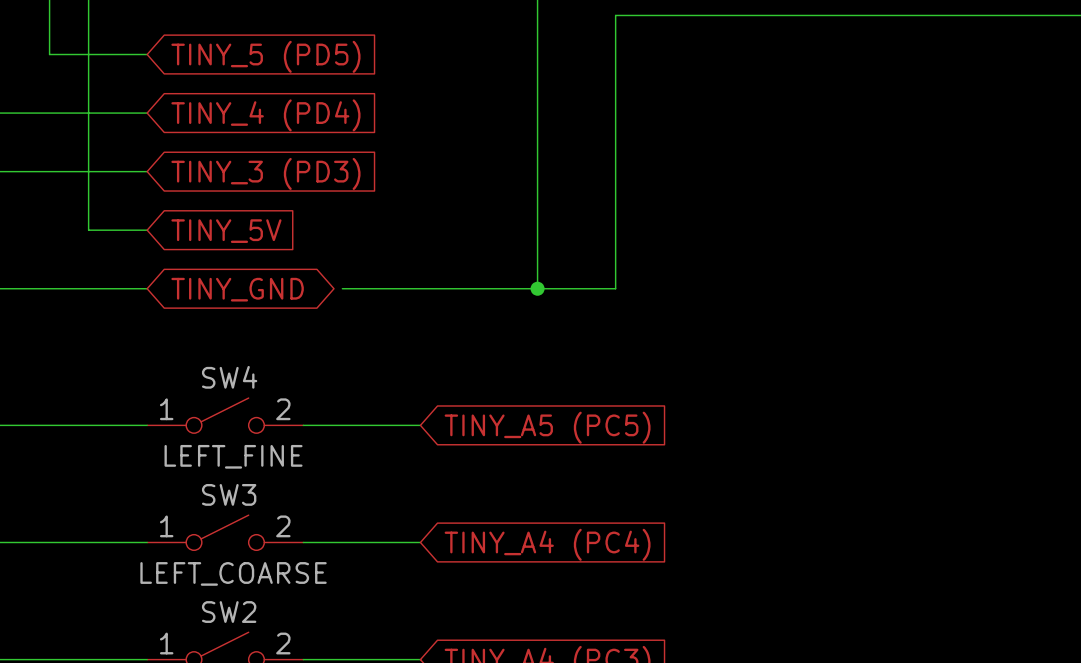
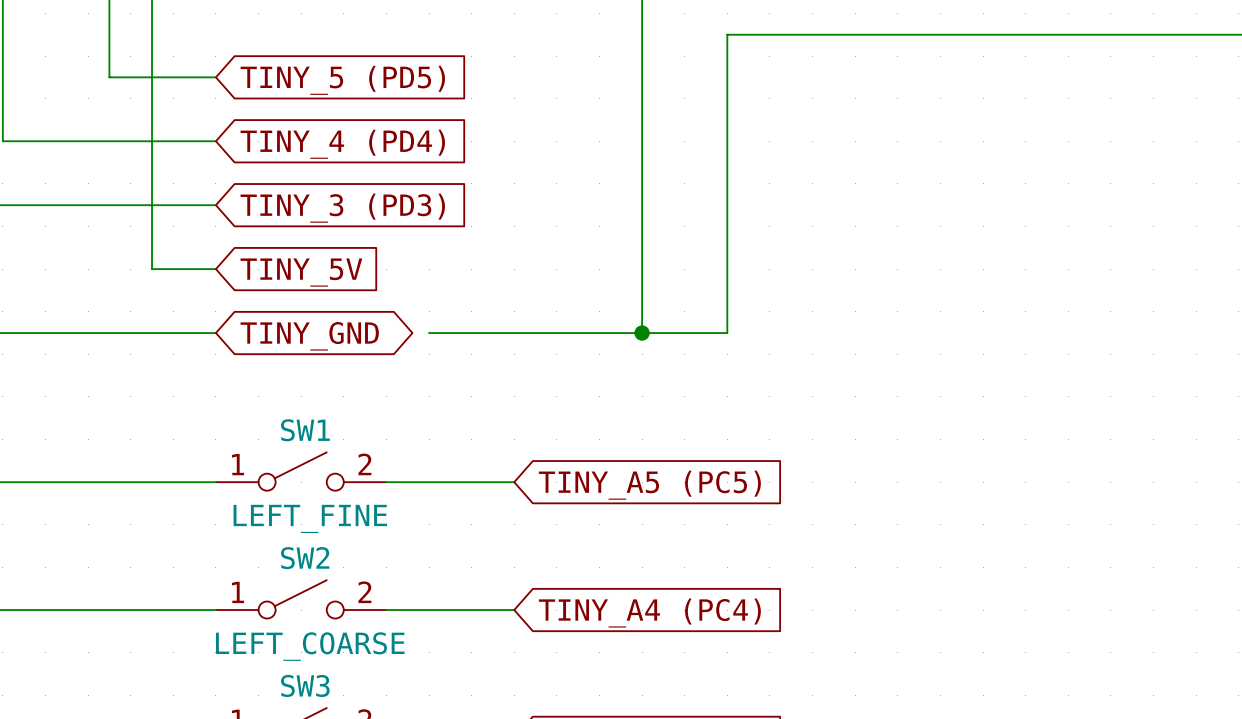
SW4 name: SW4 (229, 377) -> SW1 (305, 430)
SW3 name: SW3 (229, 494) -> SW2 (305, 558)
SW2 name: SW2 (229, 612) -> SW3 (305, 685)

